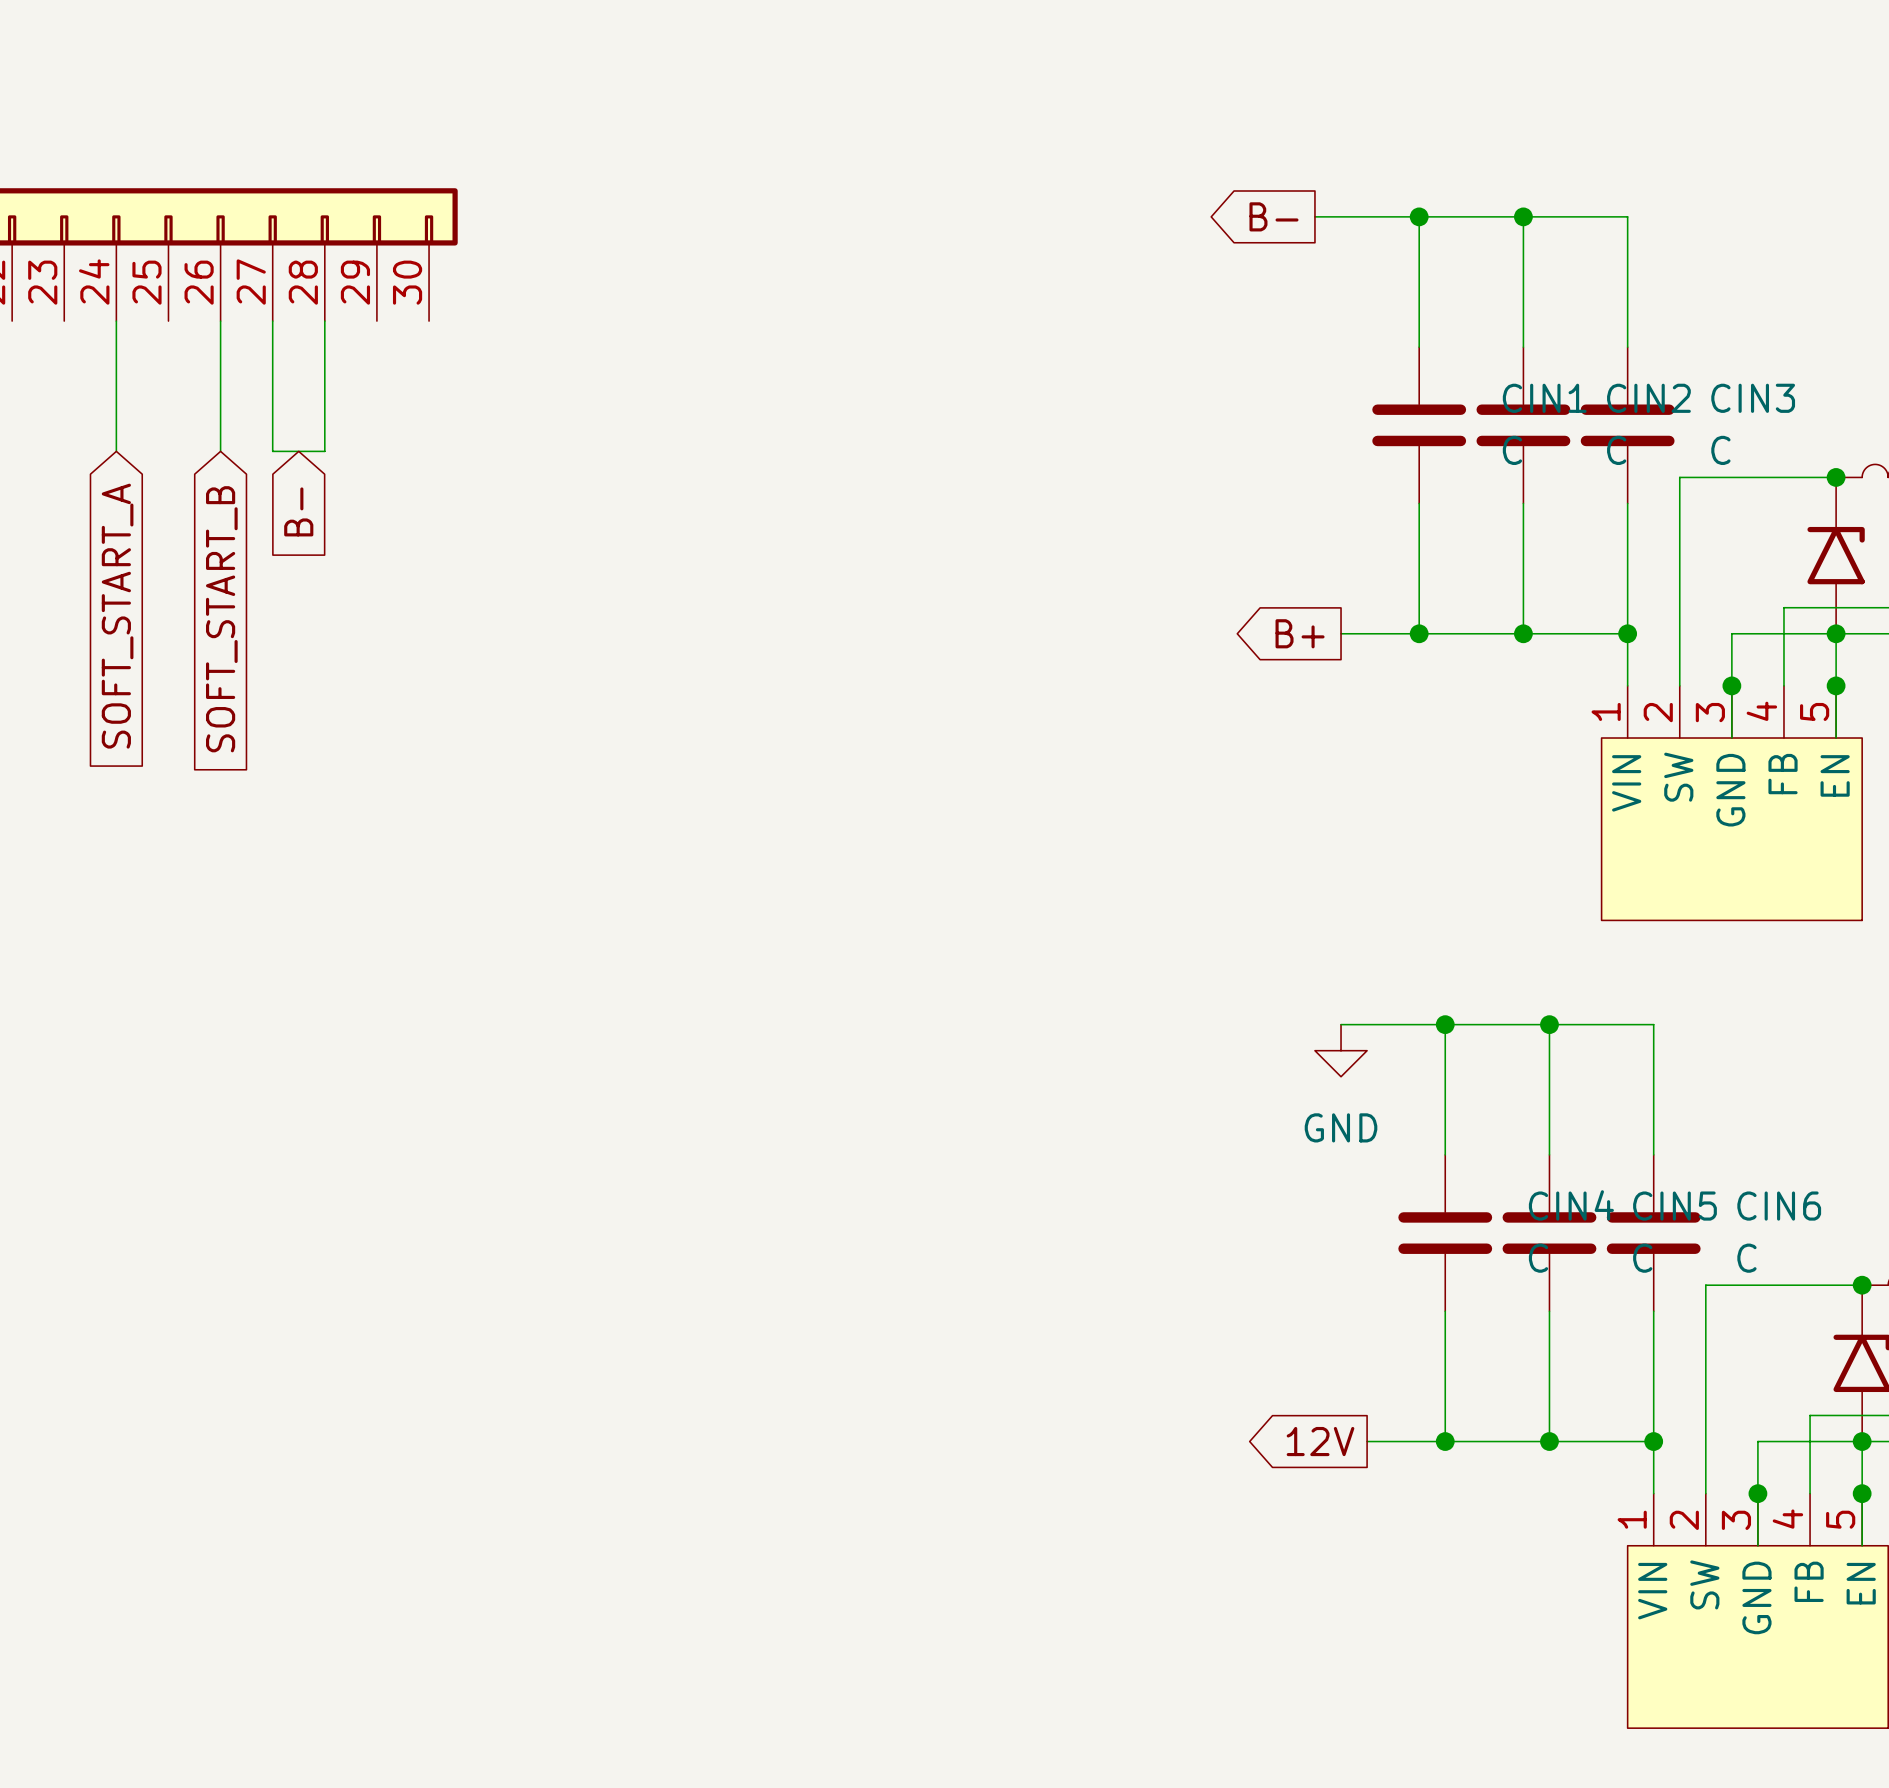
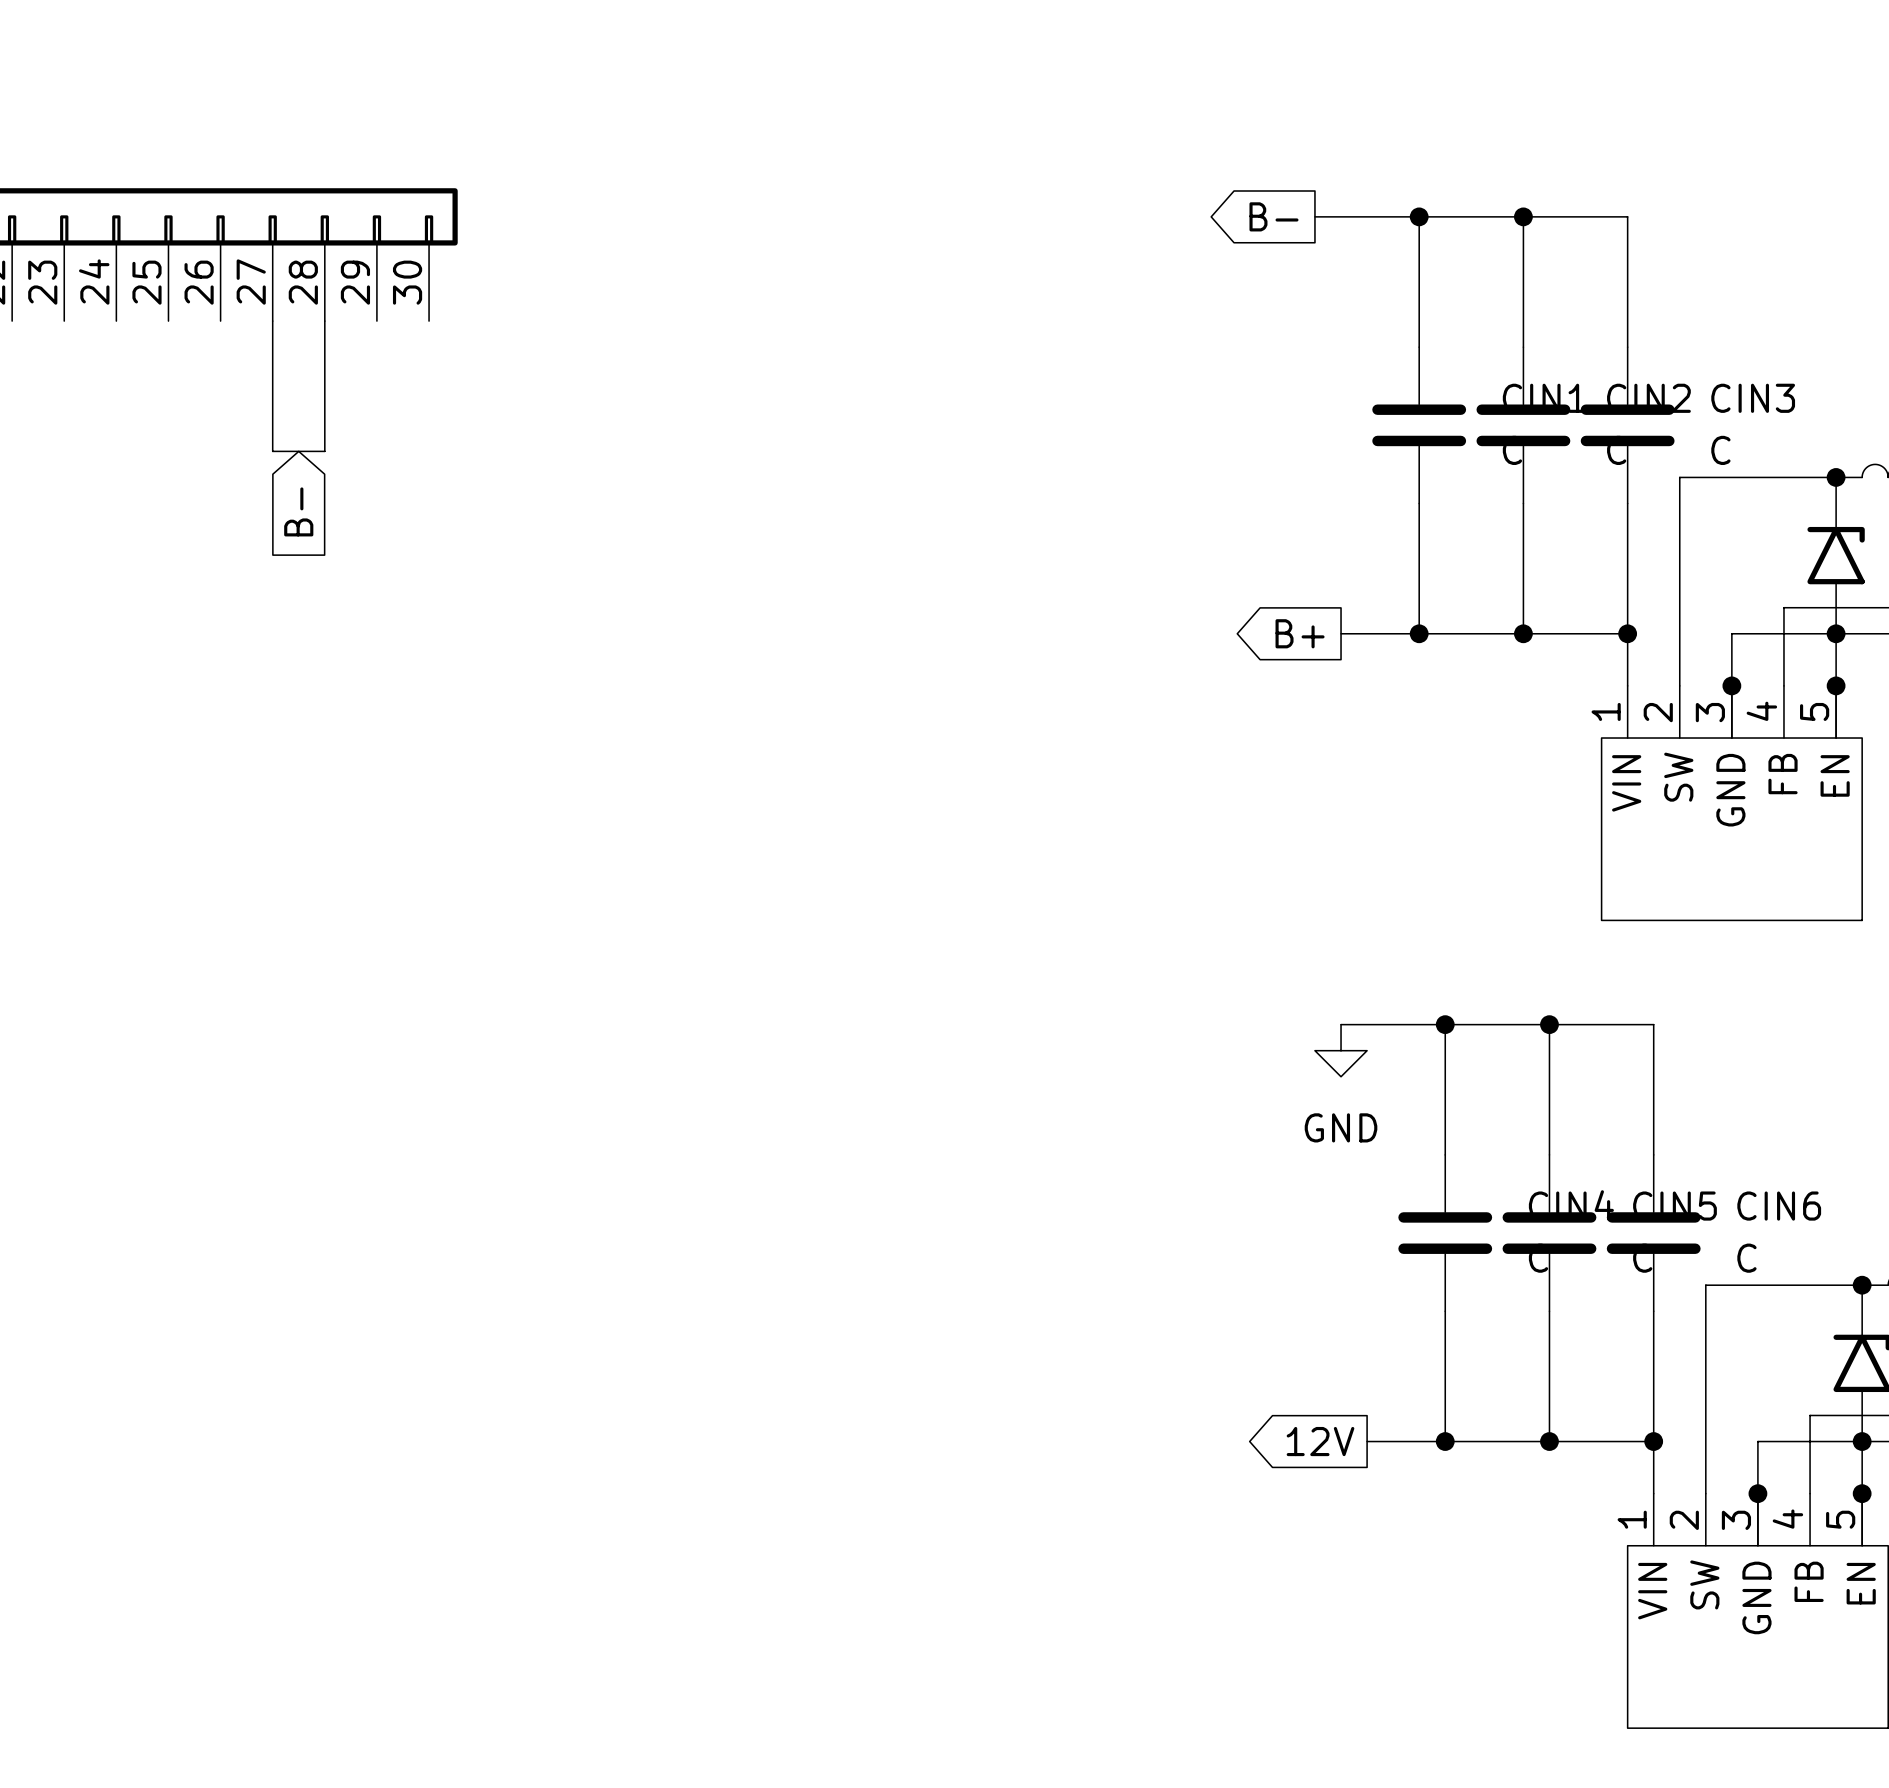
wire: (116, 321) (116, 451) -> none
wire: (220, 321) (220, 451) -> none
global label: SOFT_START_A (117, 616) -> none
global label: SOFT_START_B (221, 619) -> none

